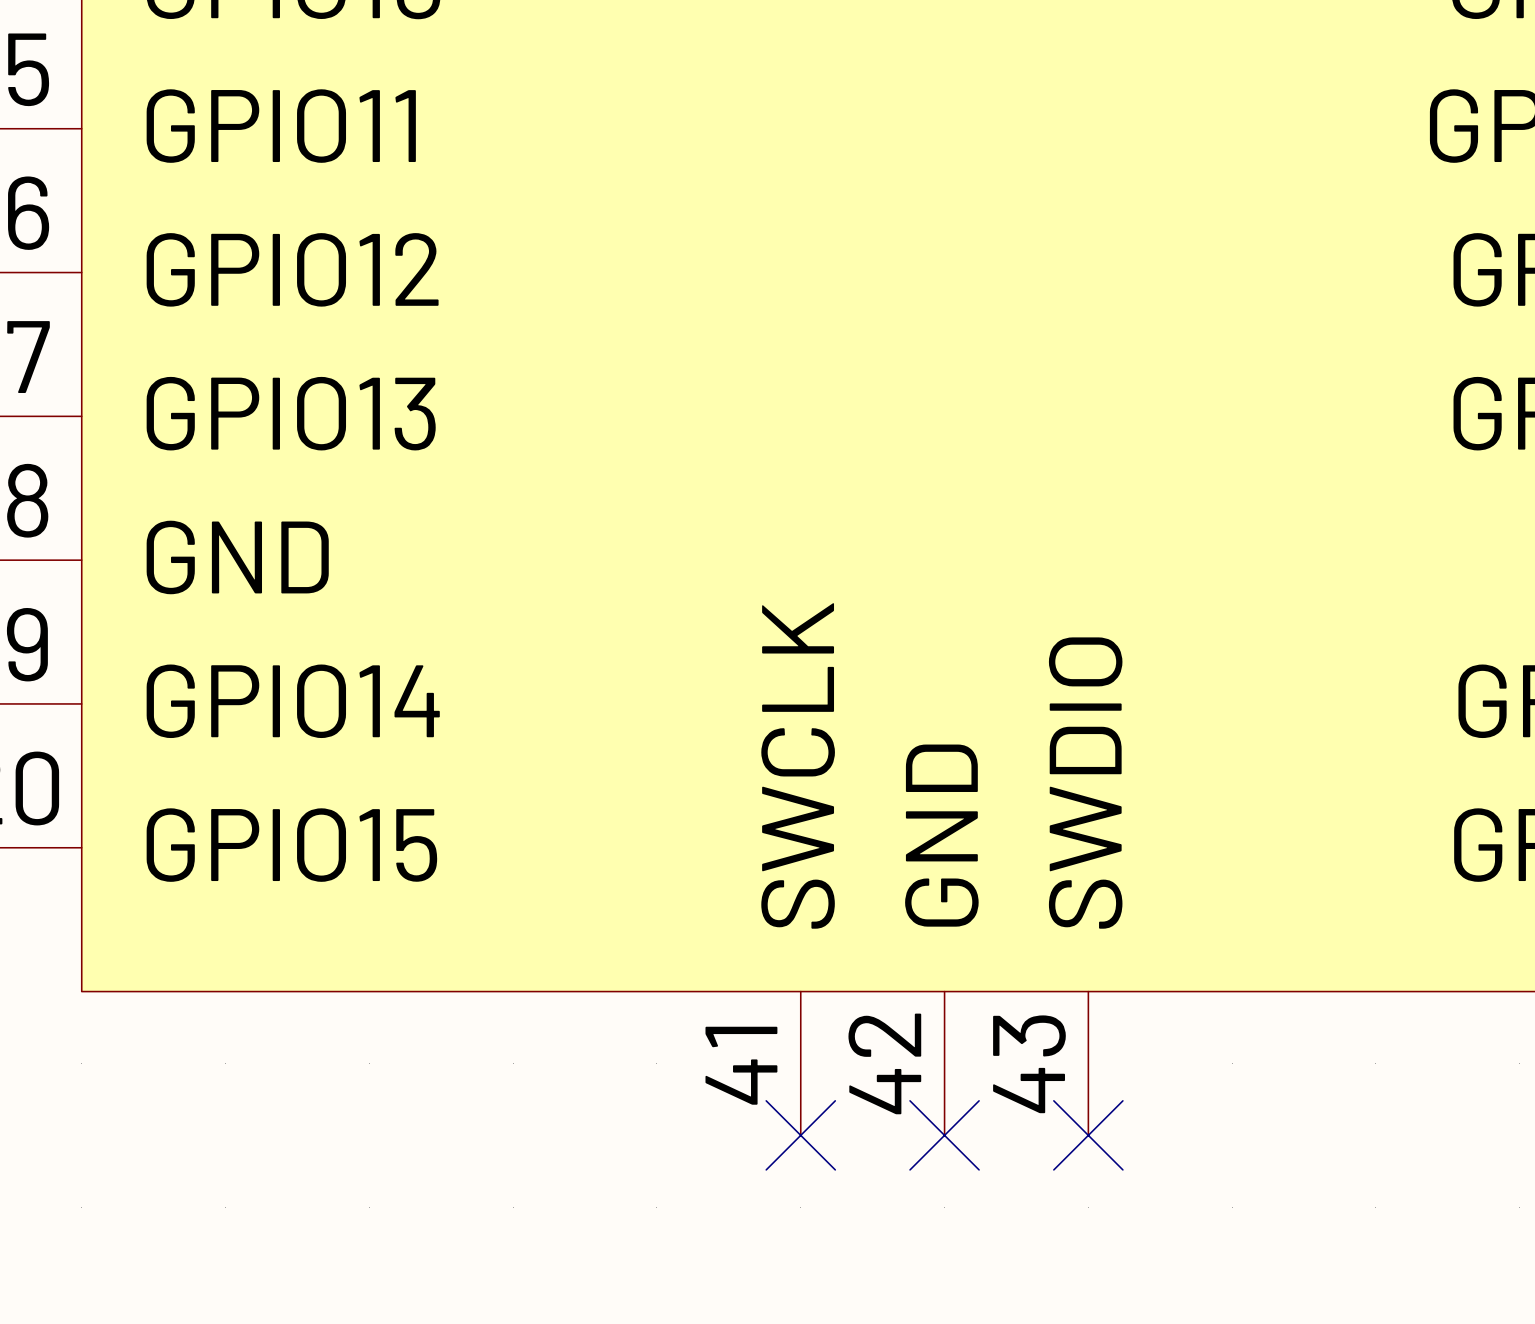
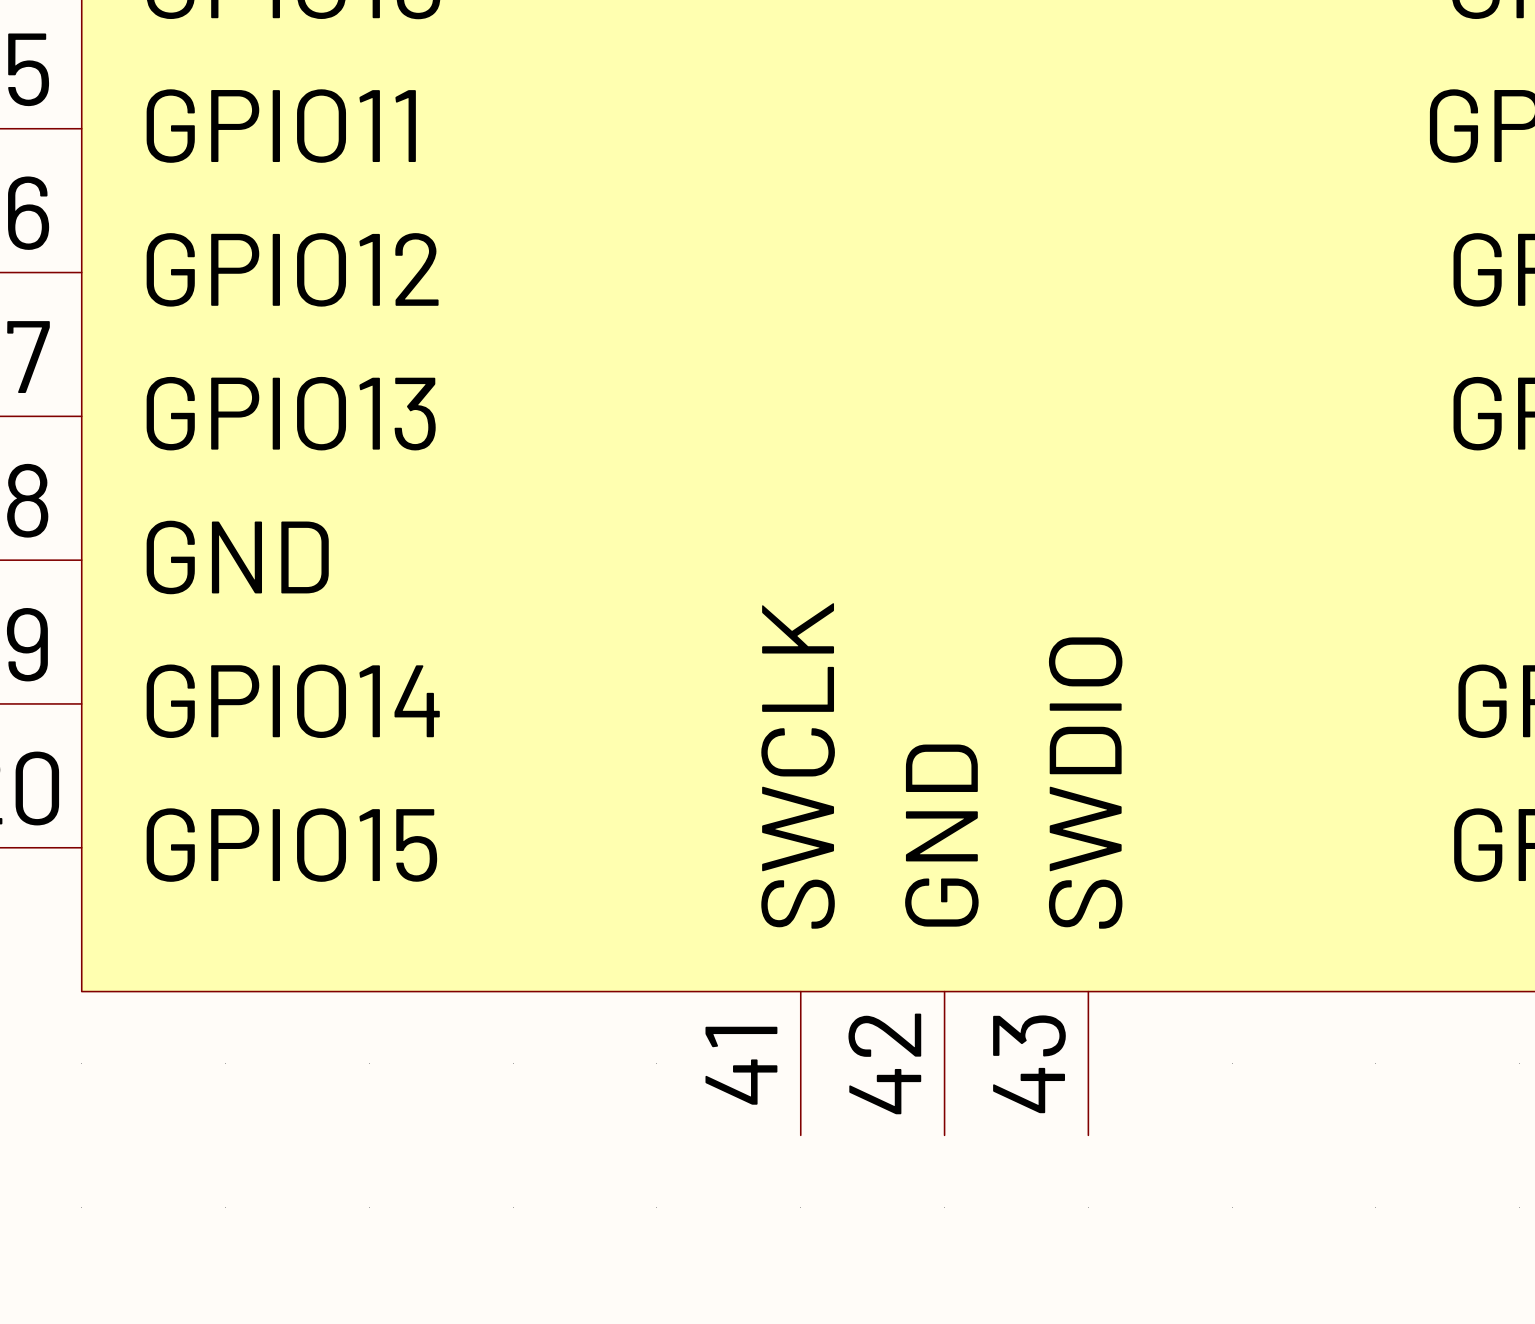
no-connect mark: (800, 1135) -> none
no-connect mark: (944, 1135) -> none
no-connect mark: (1088, 1135) -> none

